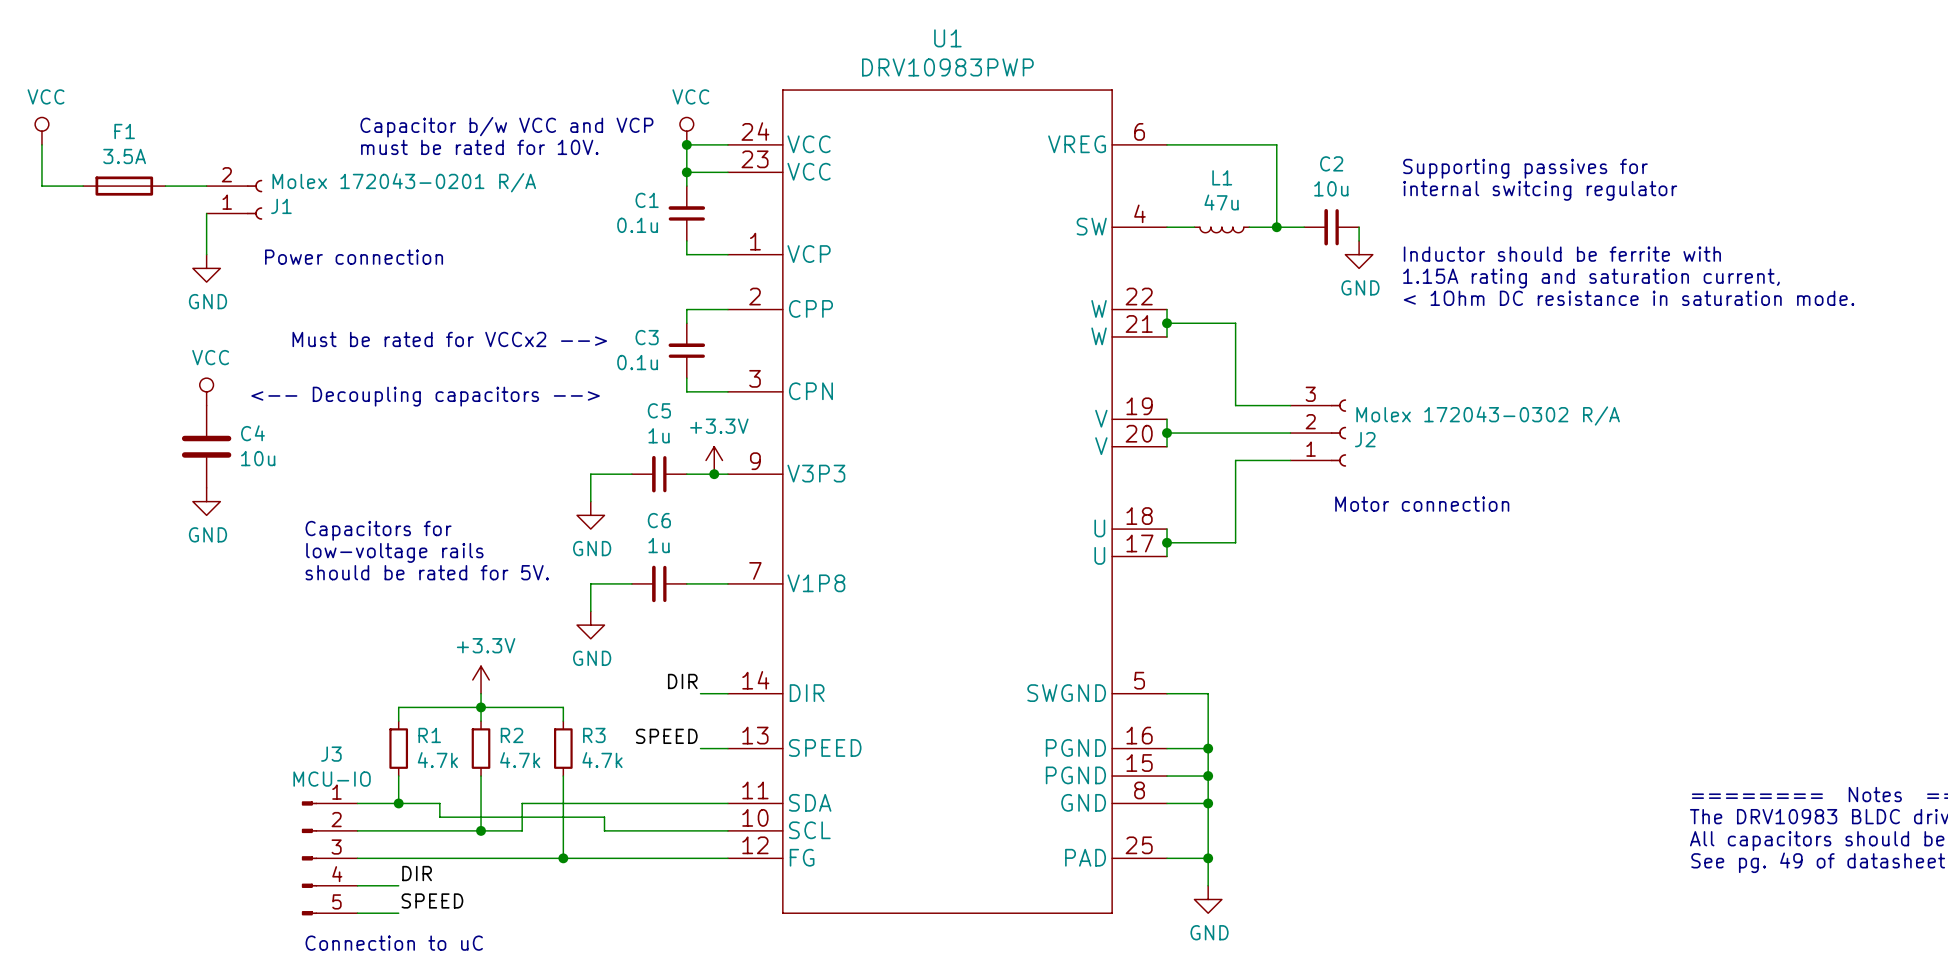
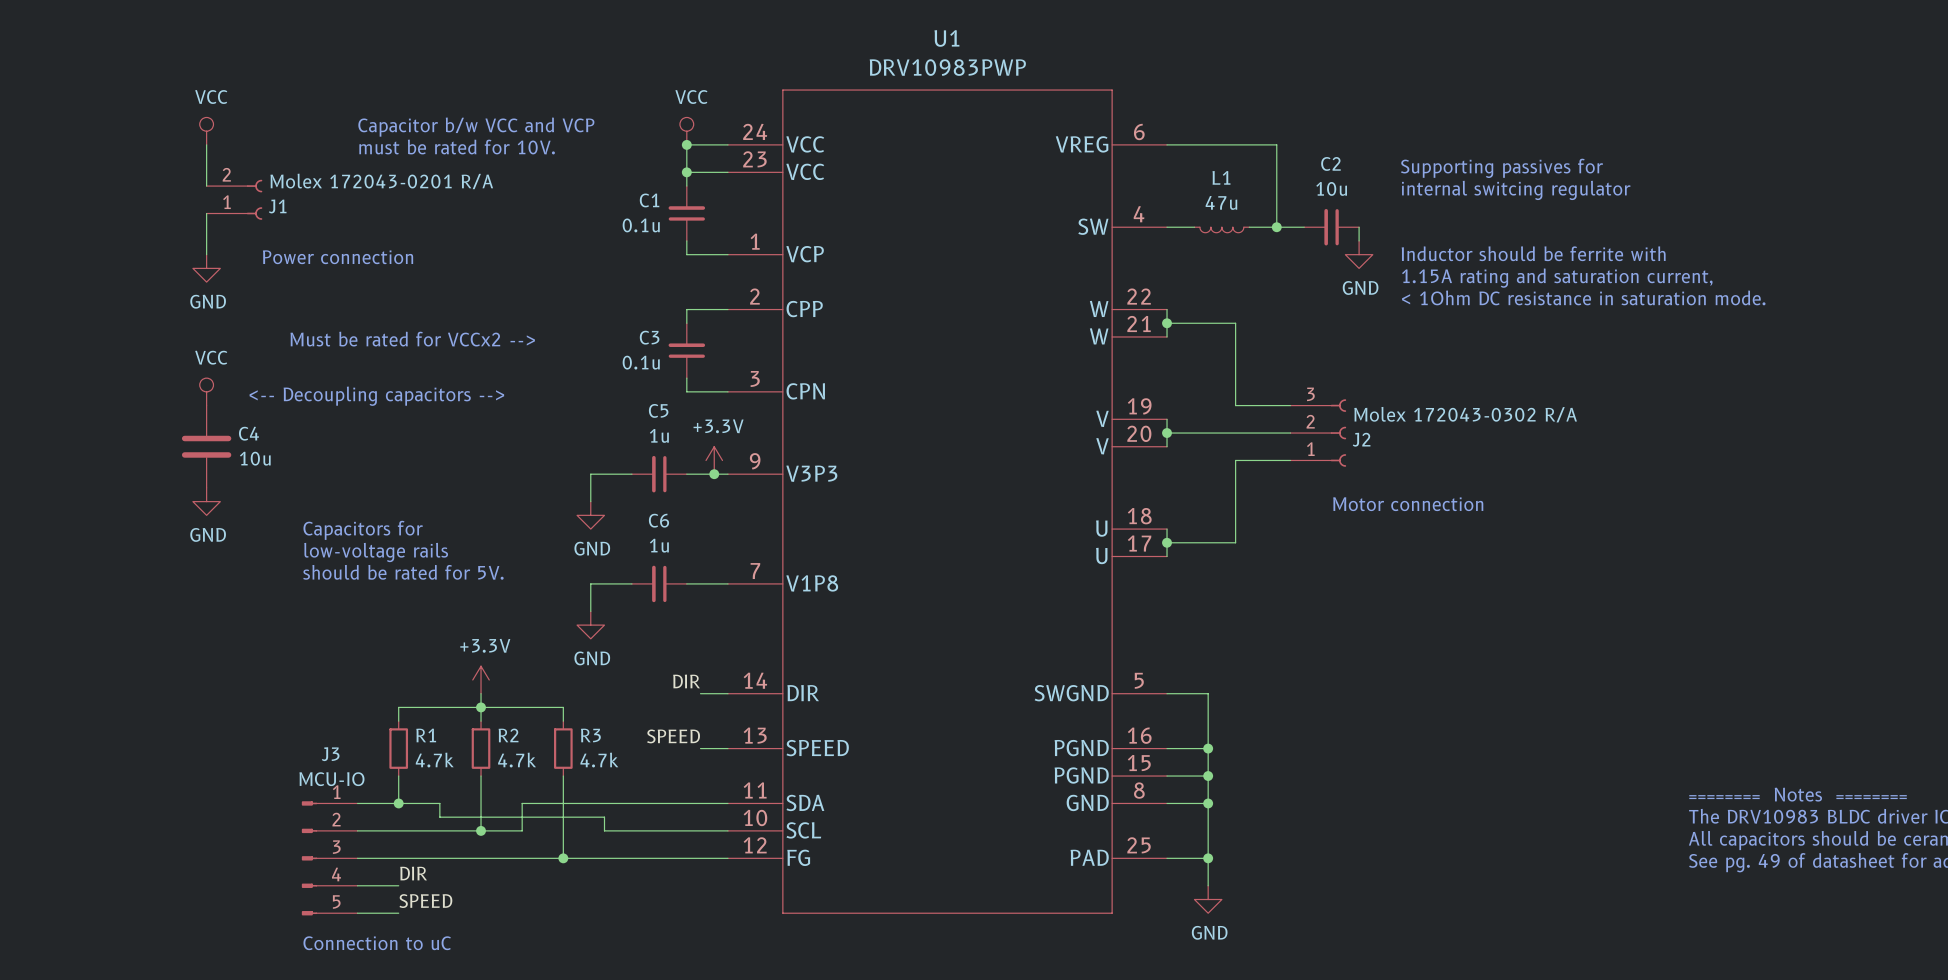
power symbol position: VCC (41, 131) -> VCC (206, 131)
wire: (41, 144) (41, 186) (83, 186) -> none
F1: 3.5A (124, 186) -> none
wire: (165, 186) (206, 186) -> (206, 144) (206, 186)

